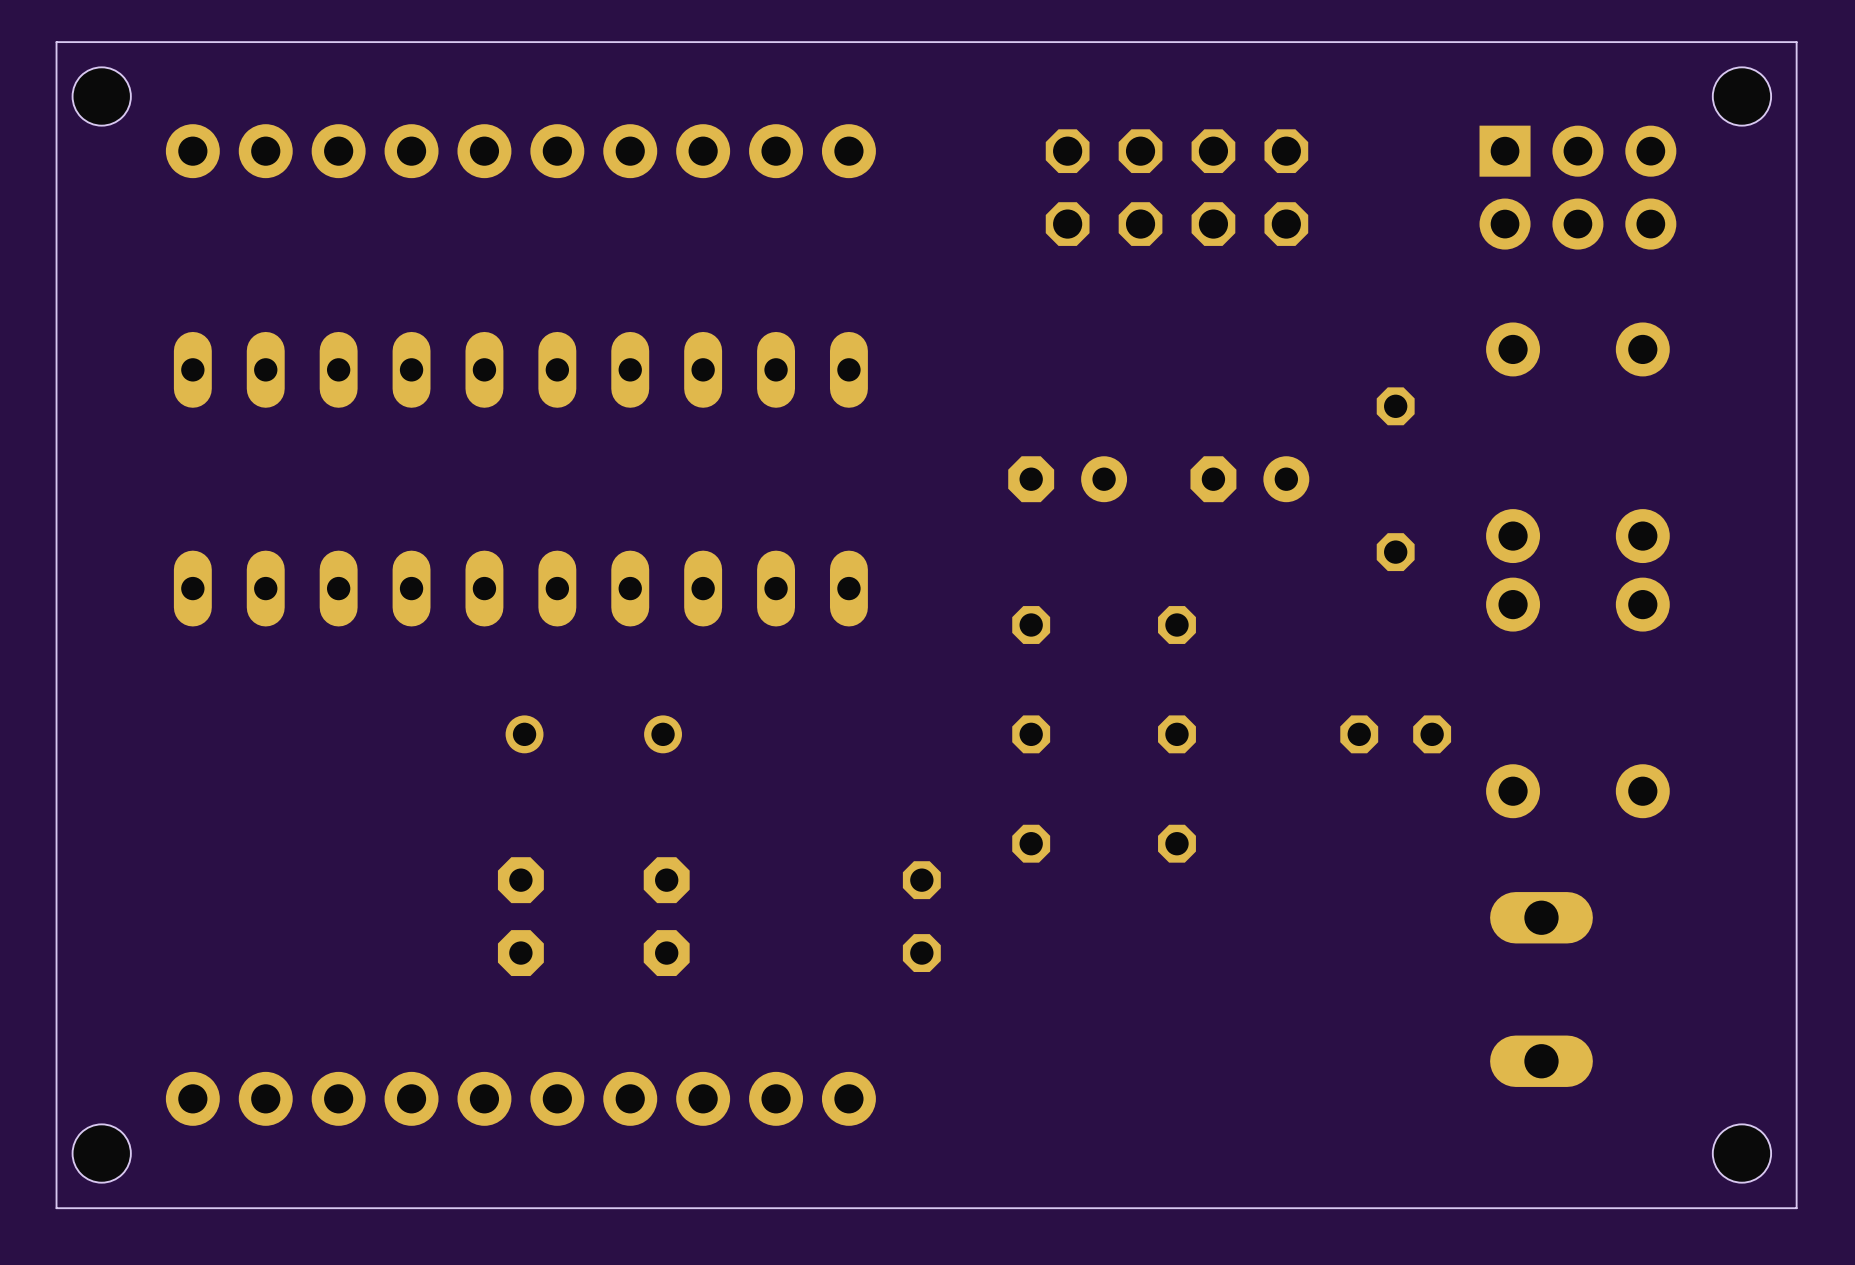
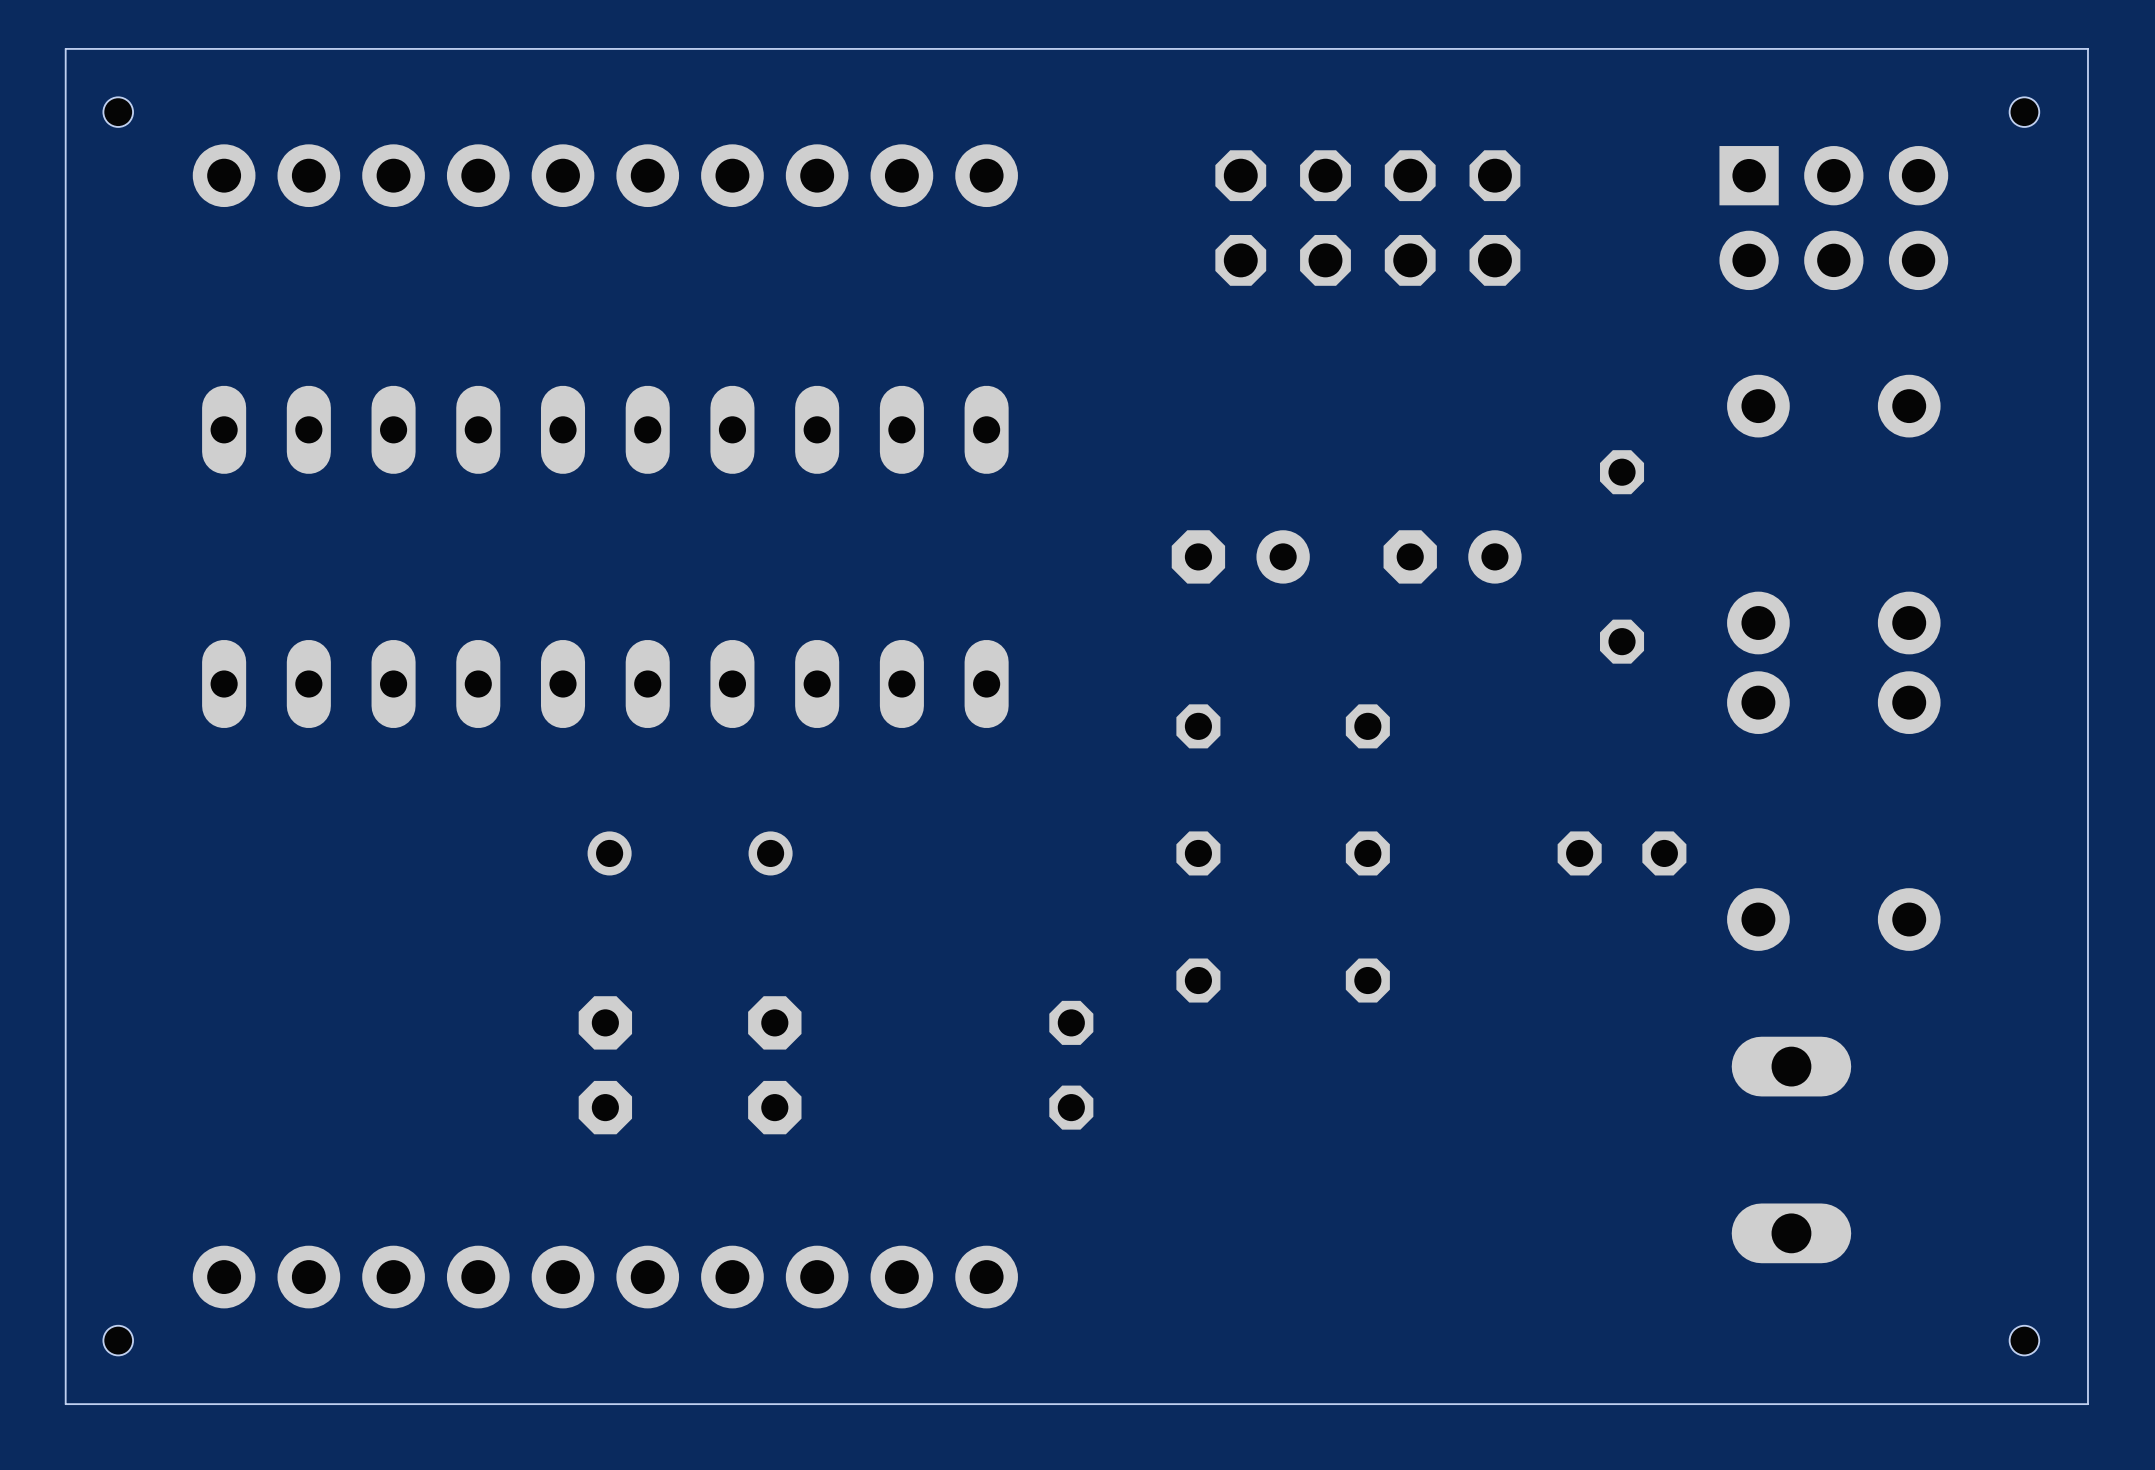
hole size: [72, 67, 131, 126] -> [103, 97, 134, 127]
hole size: [1712, 67, 1772, 126] -> [2009, 97, 2040, 127]
hole size: [72, 1124, 131, 1183] -> [103, 1325, 134, 1356]
hole size: [1712, 1124, 1772, 1183] -> [2009, 1325, 2040, 1356]

